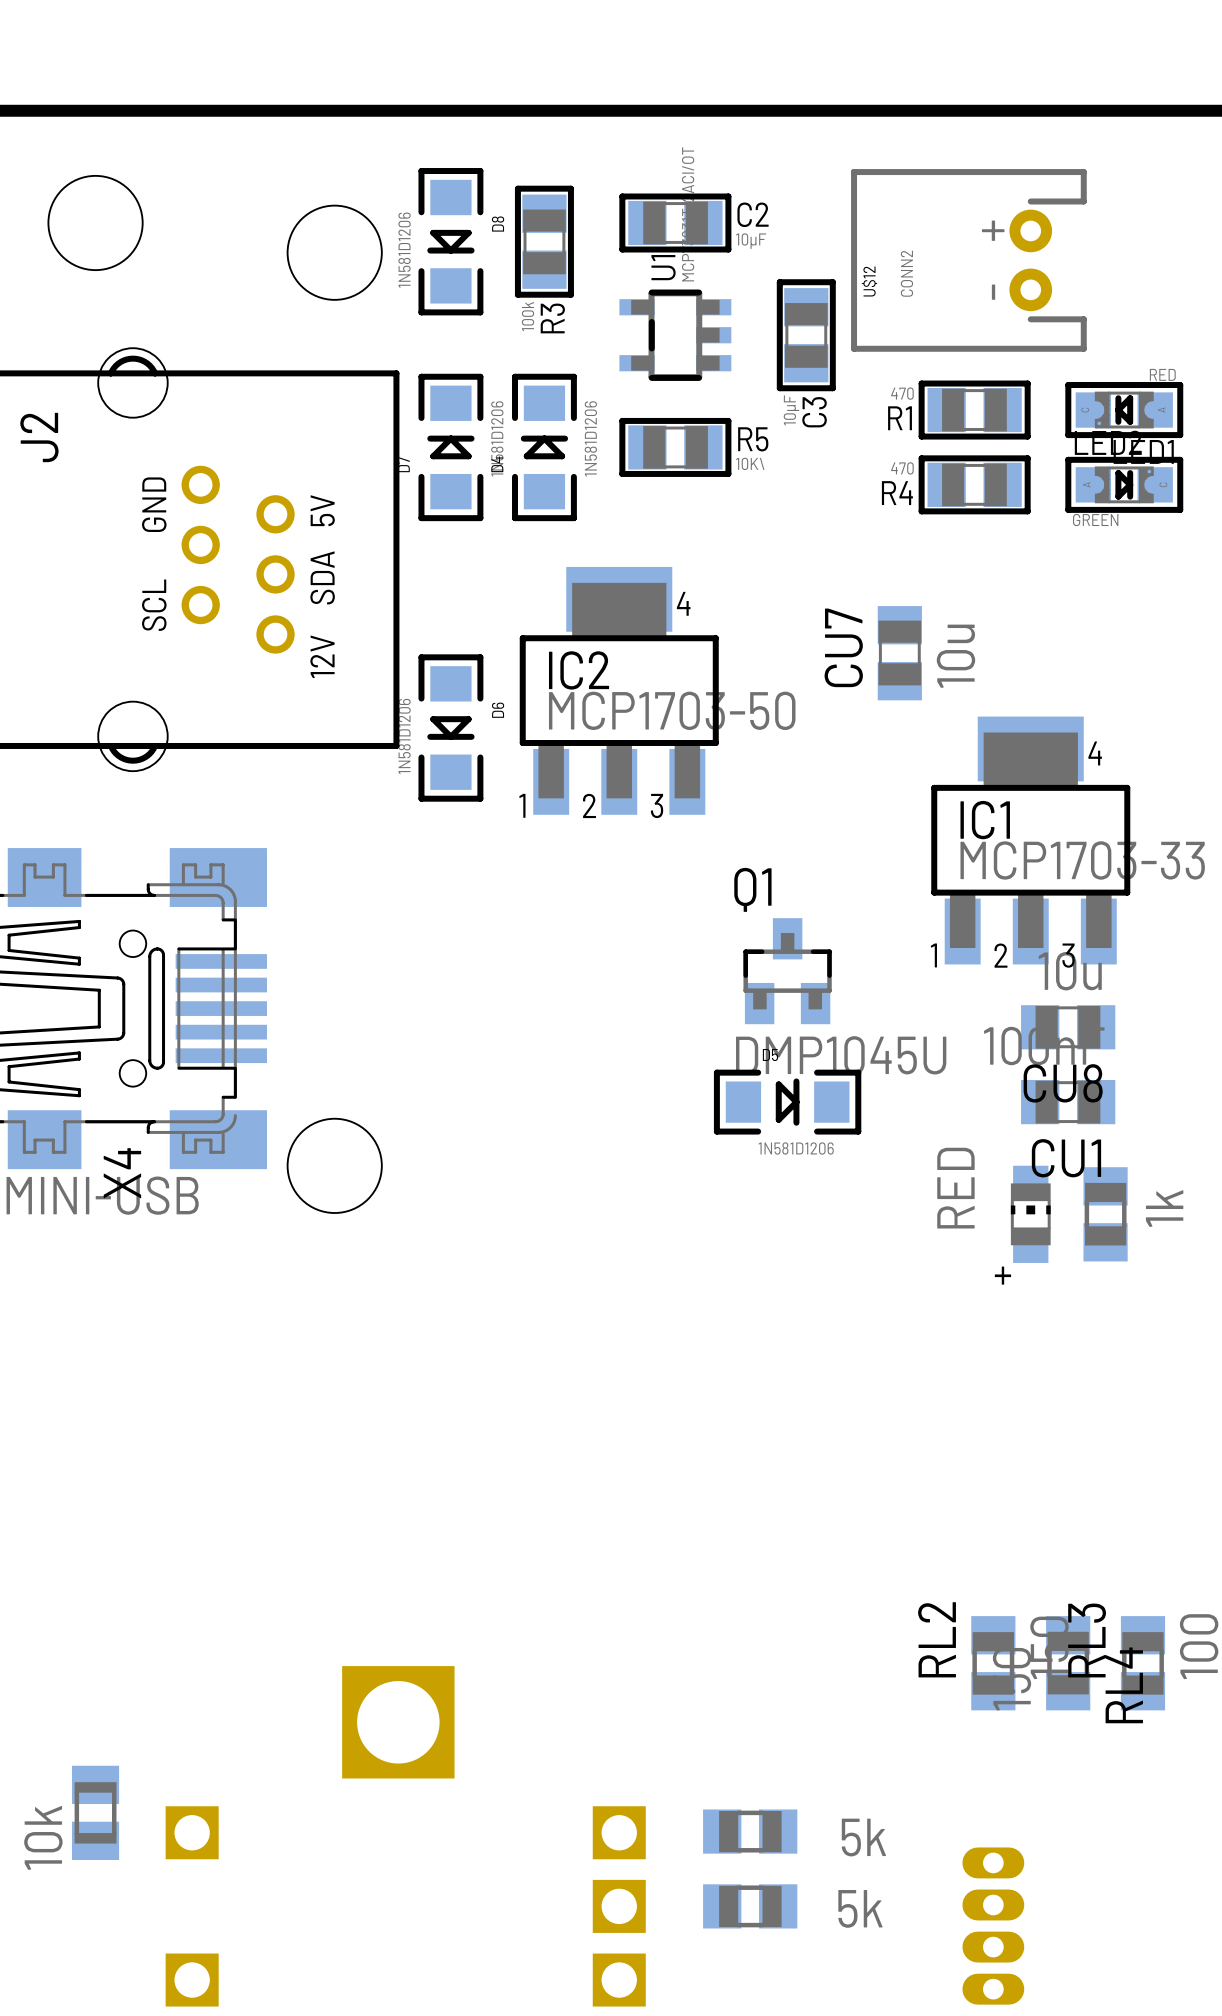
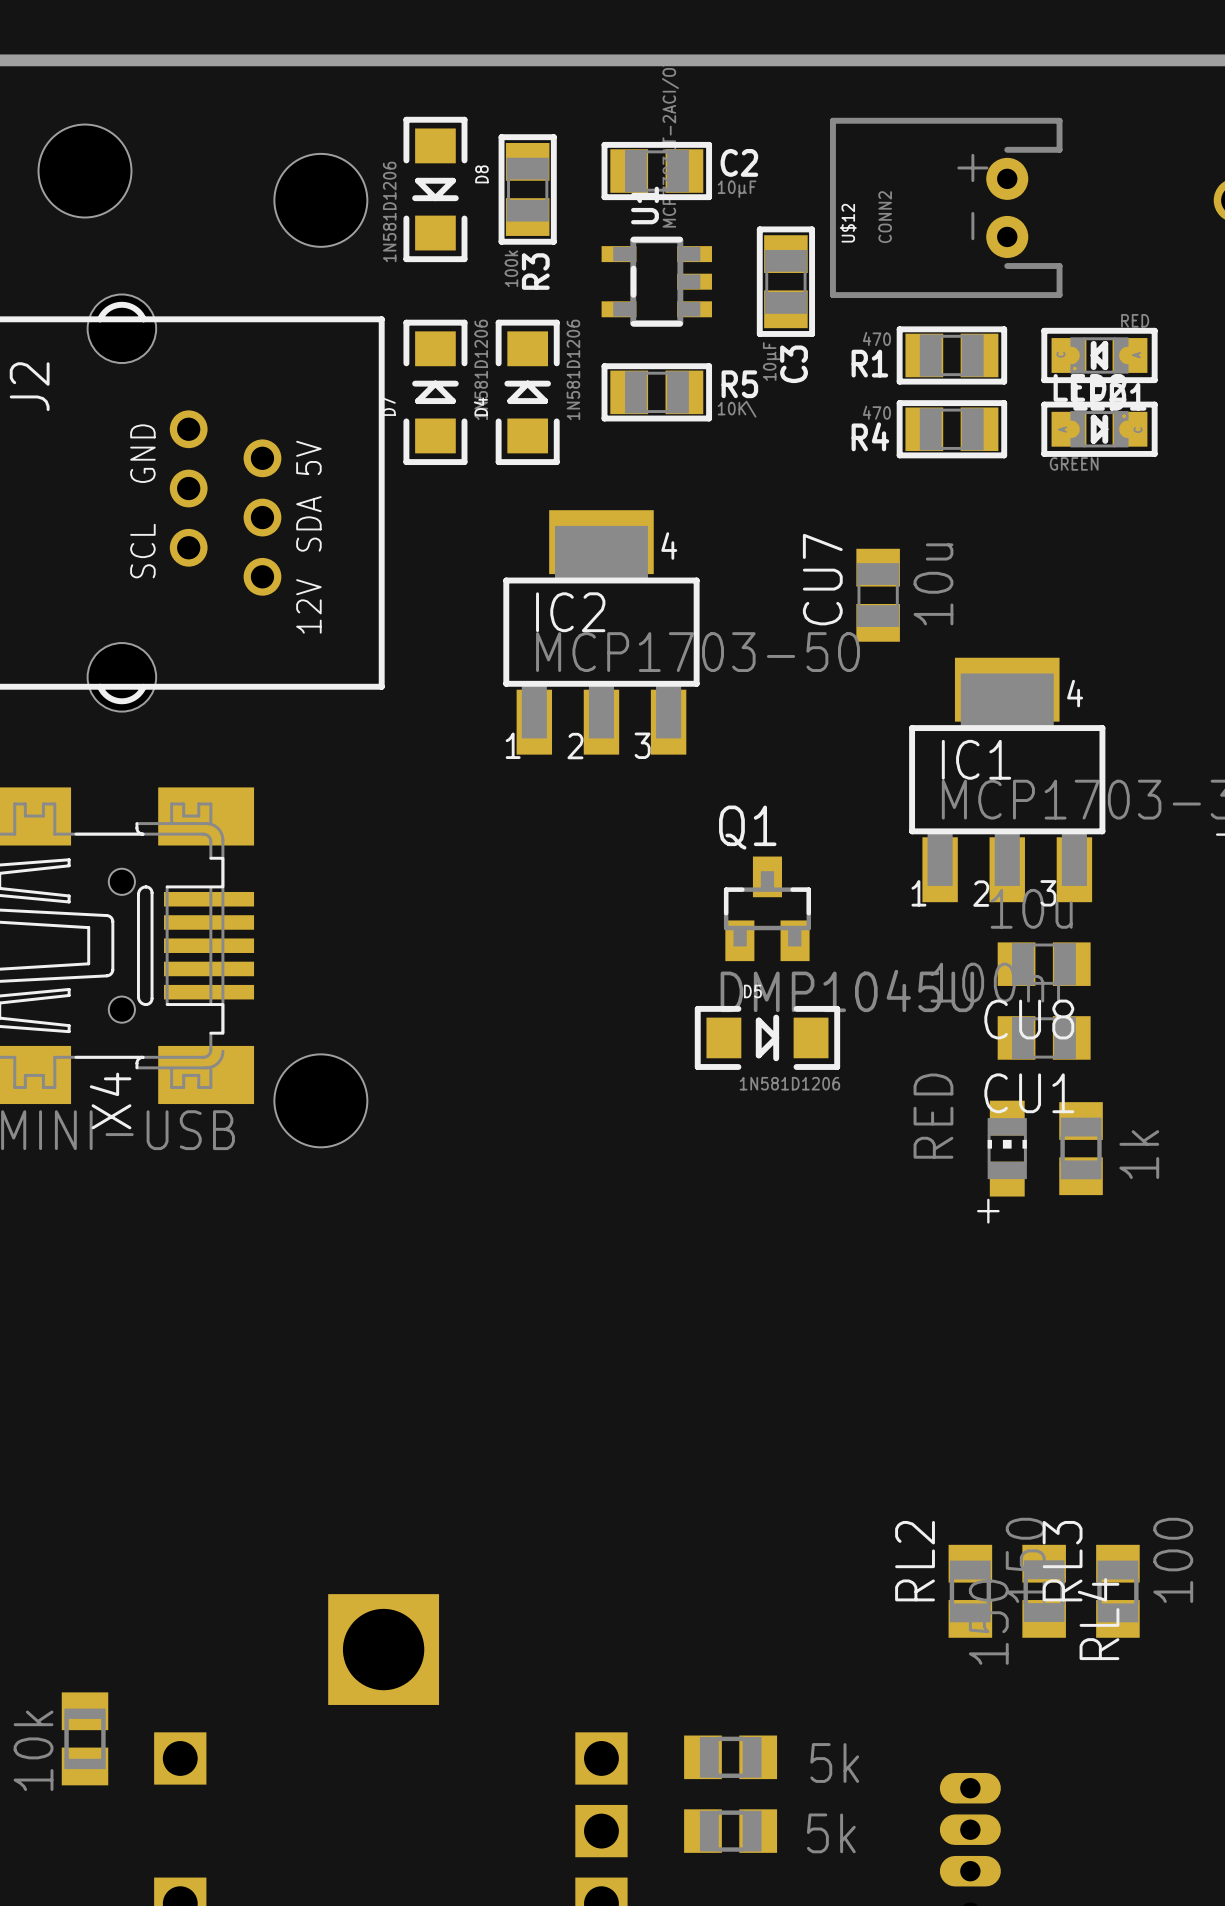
D6: 1N581D1206 (450, 728) -> none

